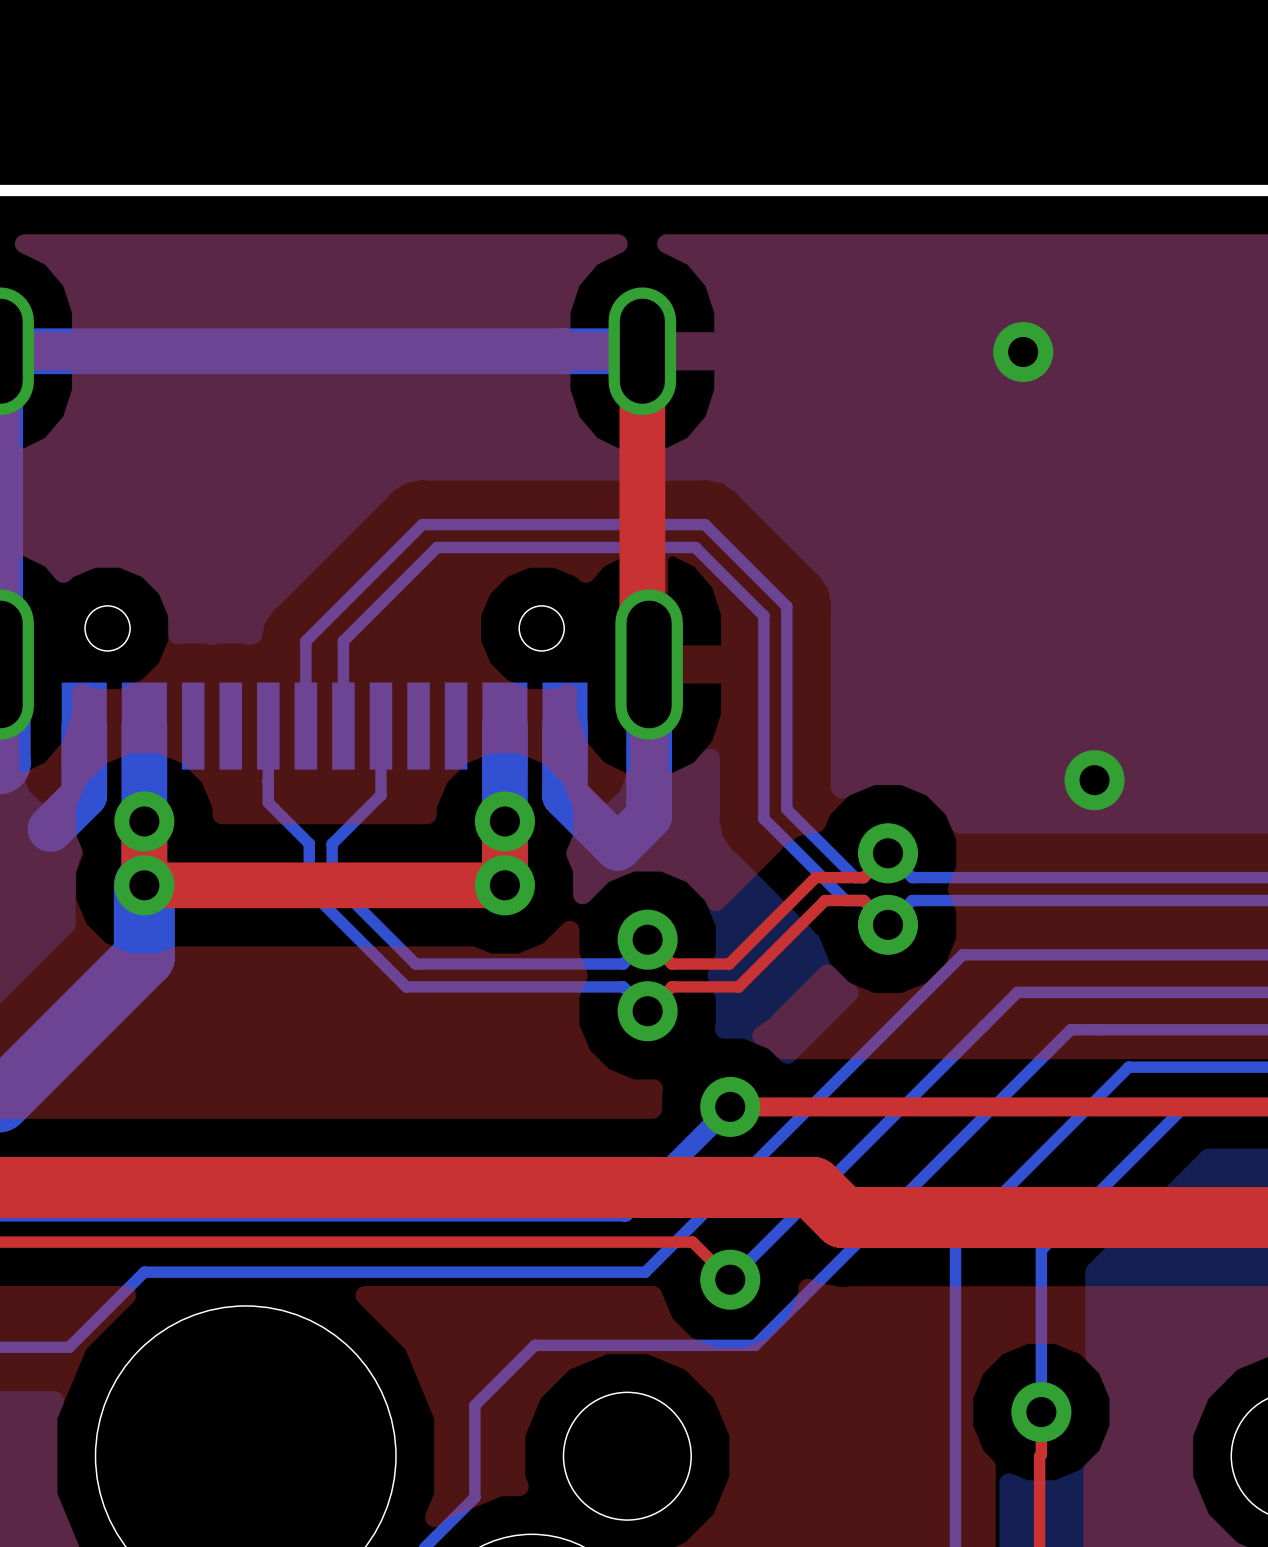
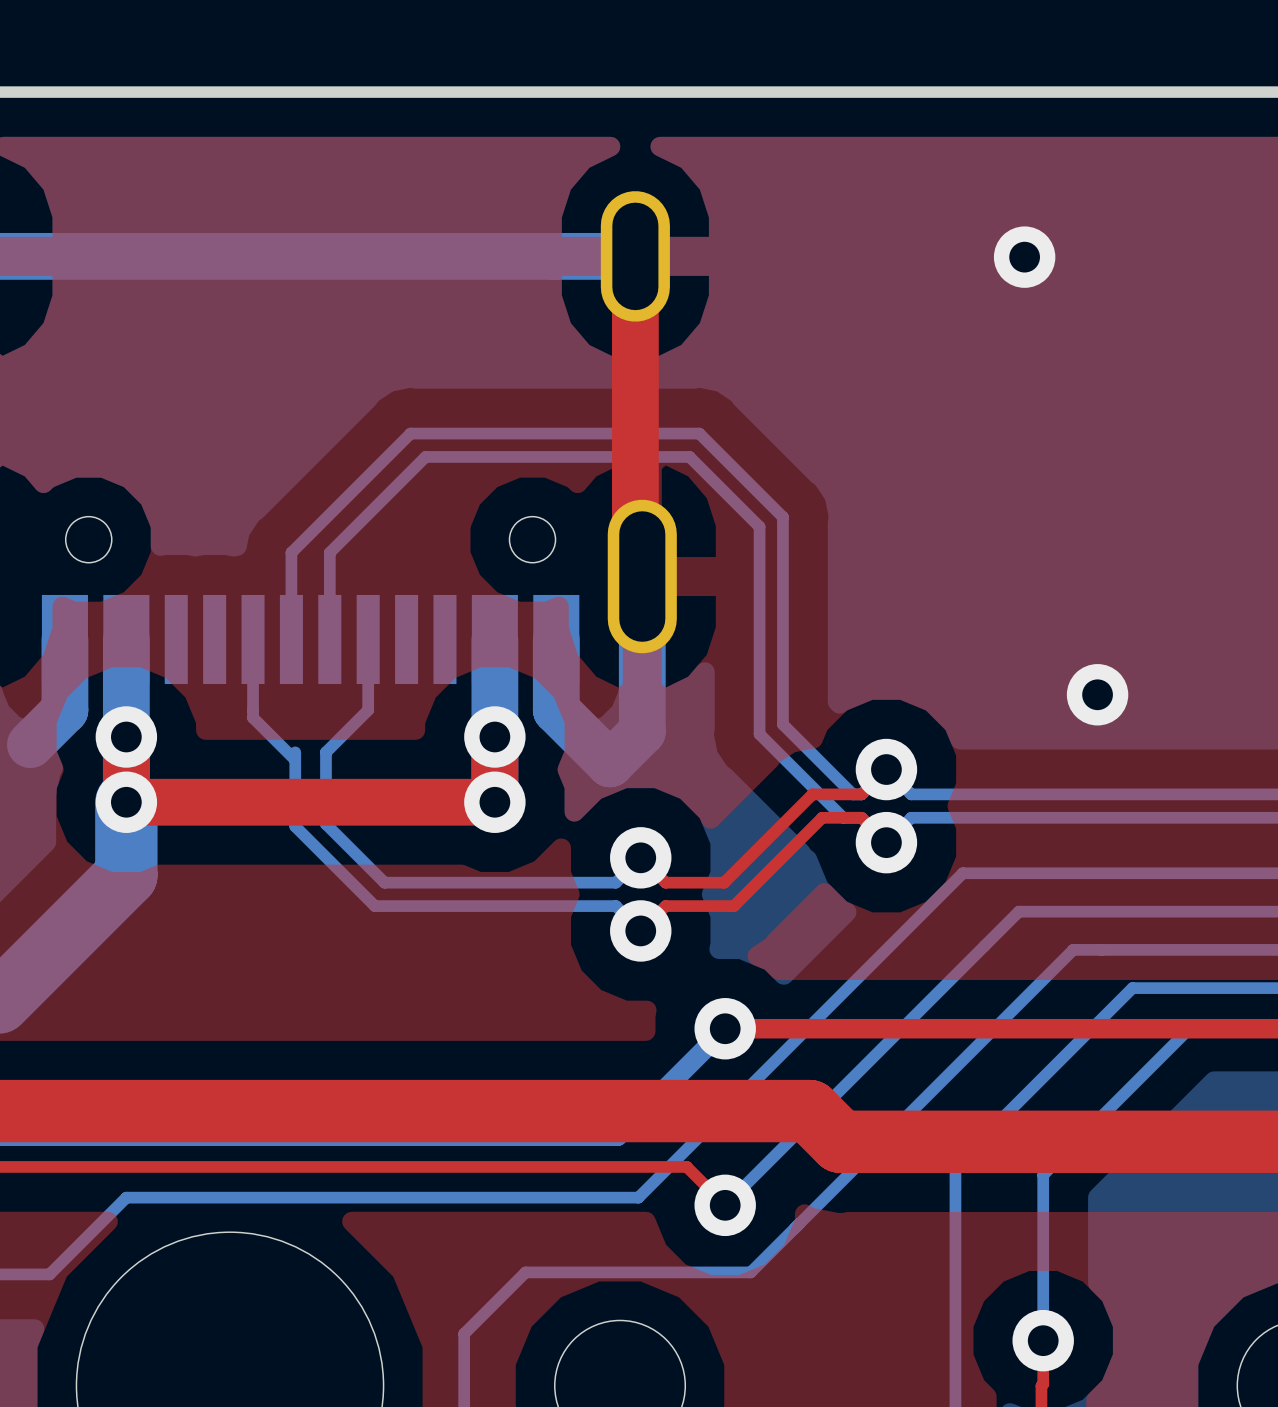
bottom track: (339, 836) (332, 844) (332, 880) (415, 964) -> (325, 752) (325, 824) (384, 882) (403, 882)
bottom track: (309, 889) (406, 986) -> (294, 806) (295, 826) (374, 906) (394, 906)

